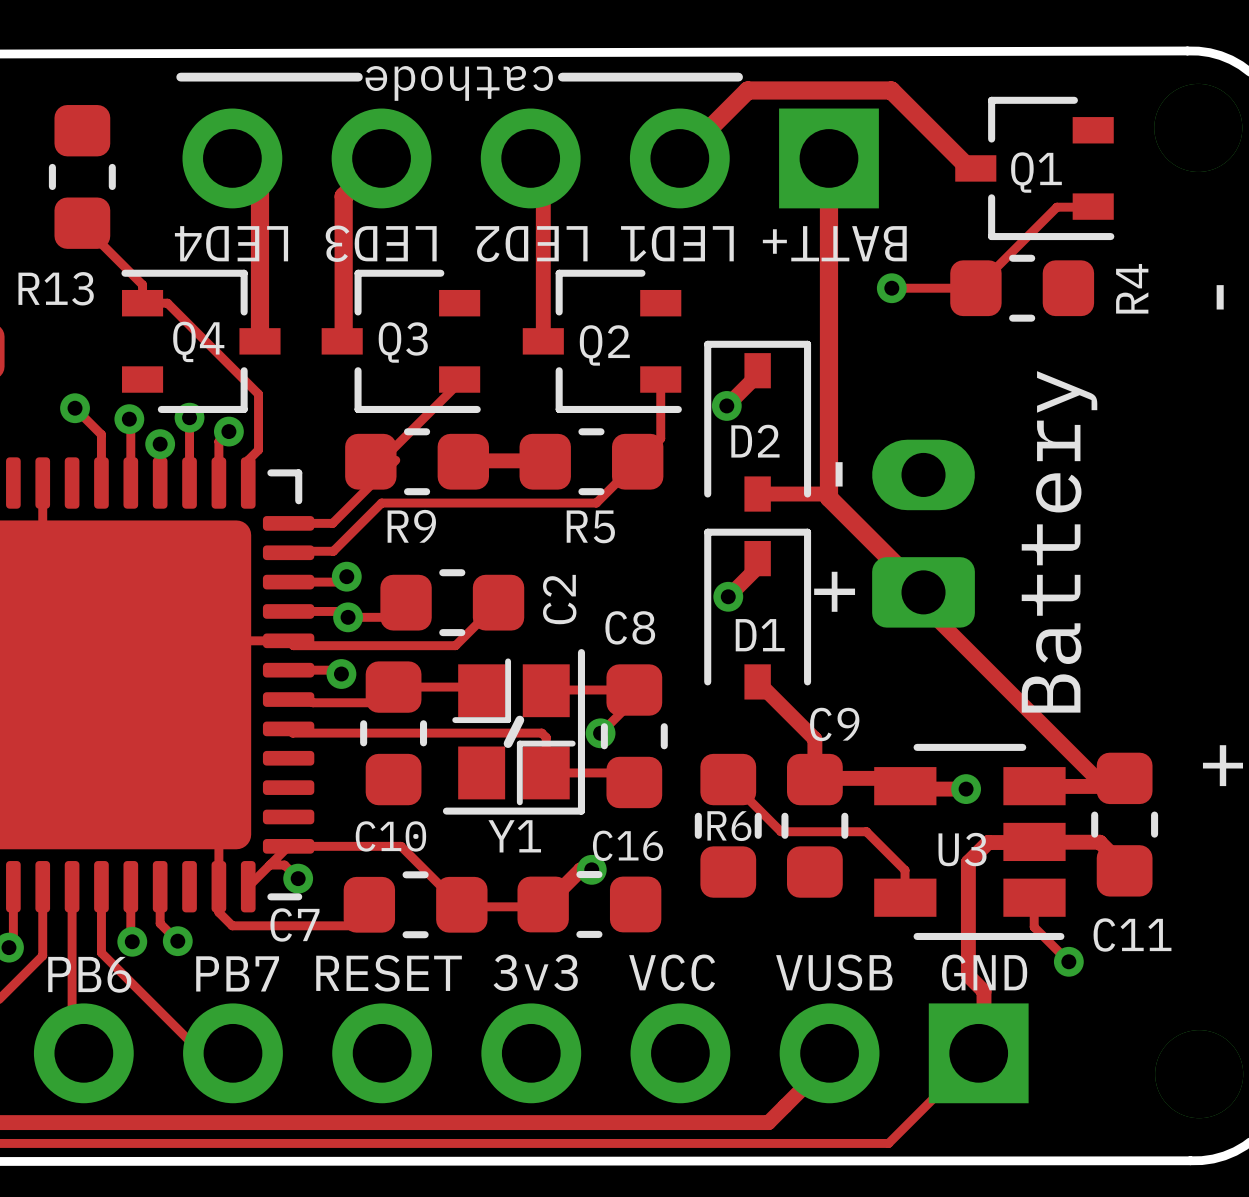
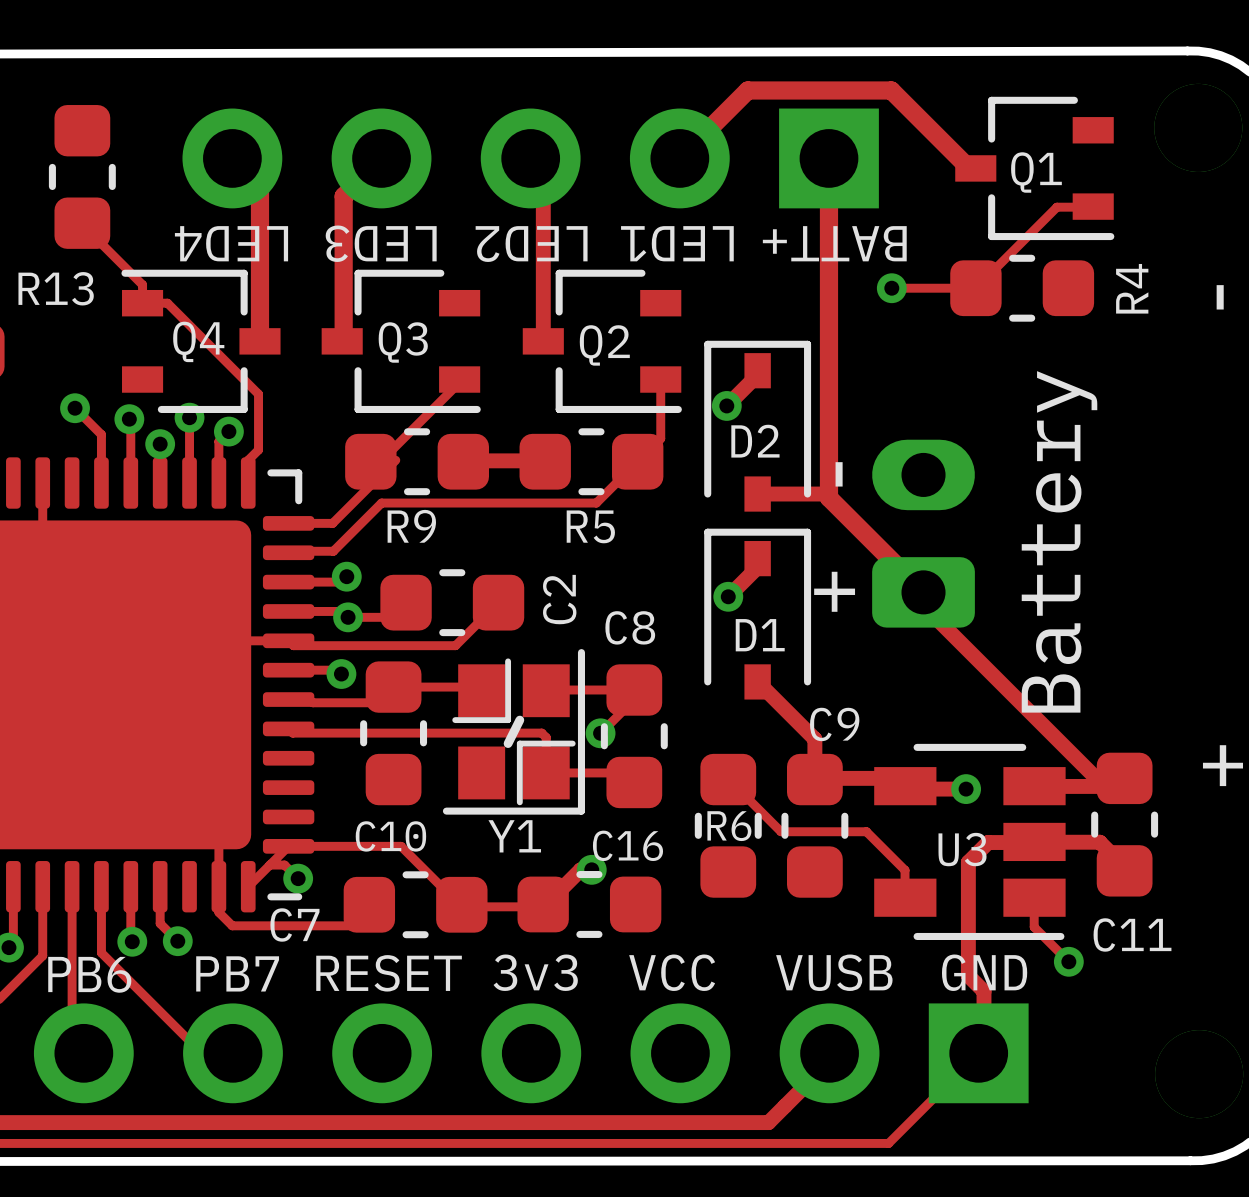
line: (180, 77) (358, 77) -> none
line: (562, 77) (738, 77) -> none
text: cathode (459, 83) -> none

